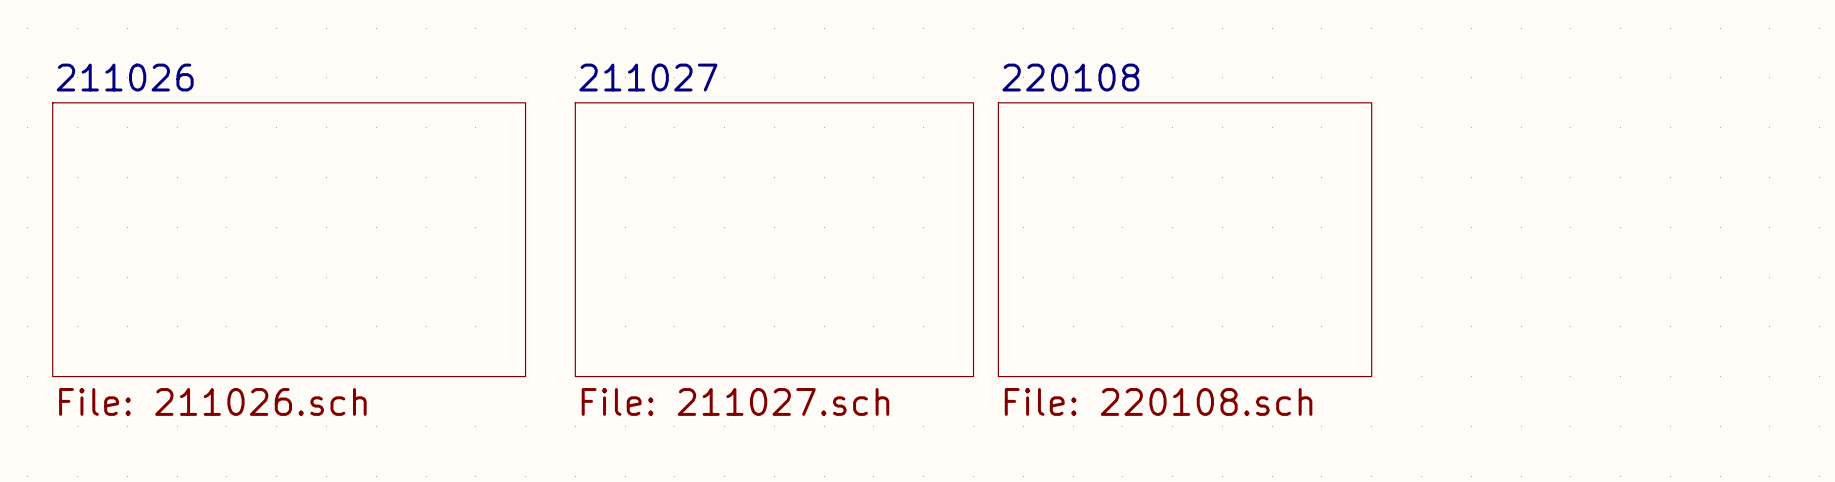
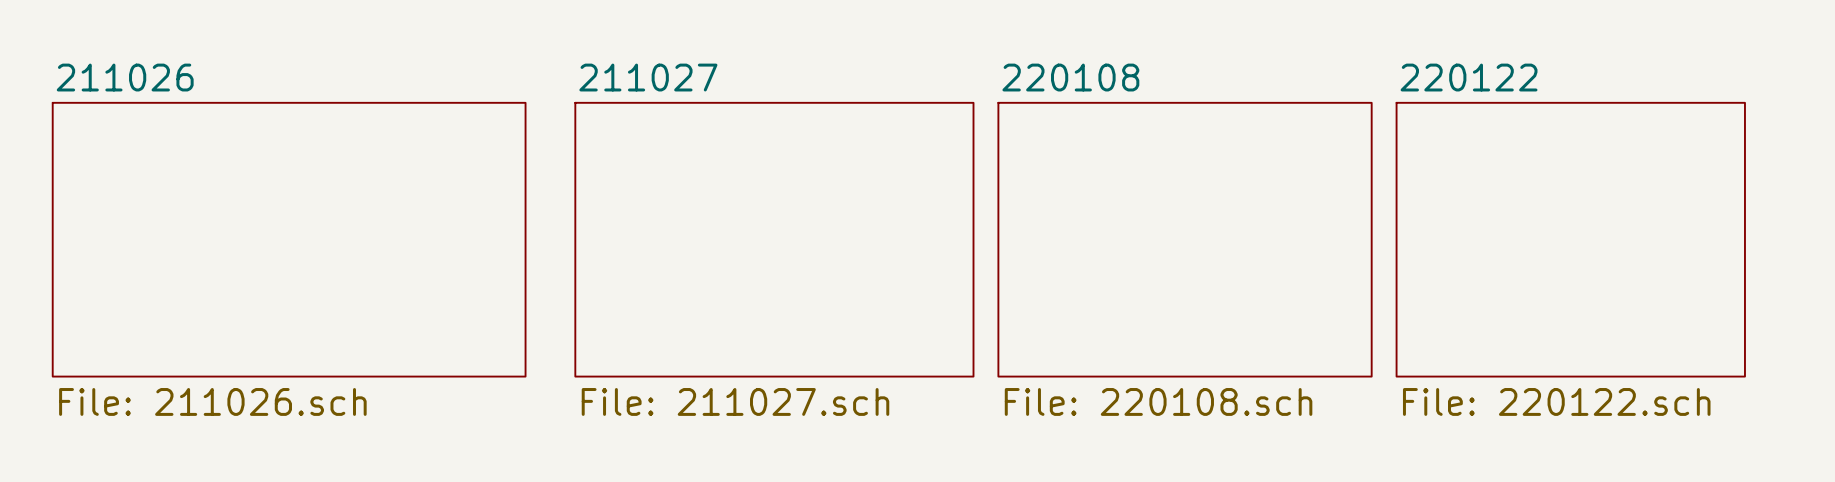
sheet 220122: none -> File: 220122.sch (1570, 239)

